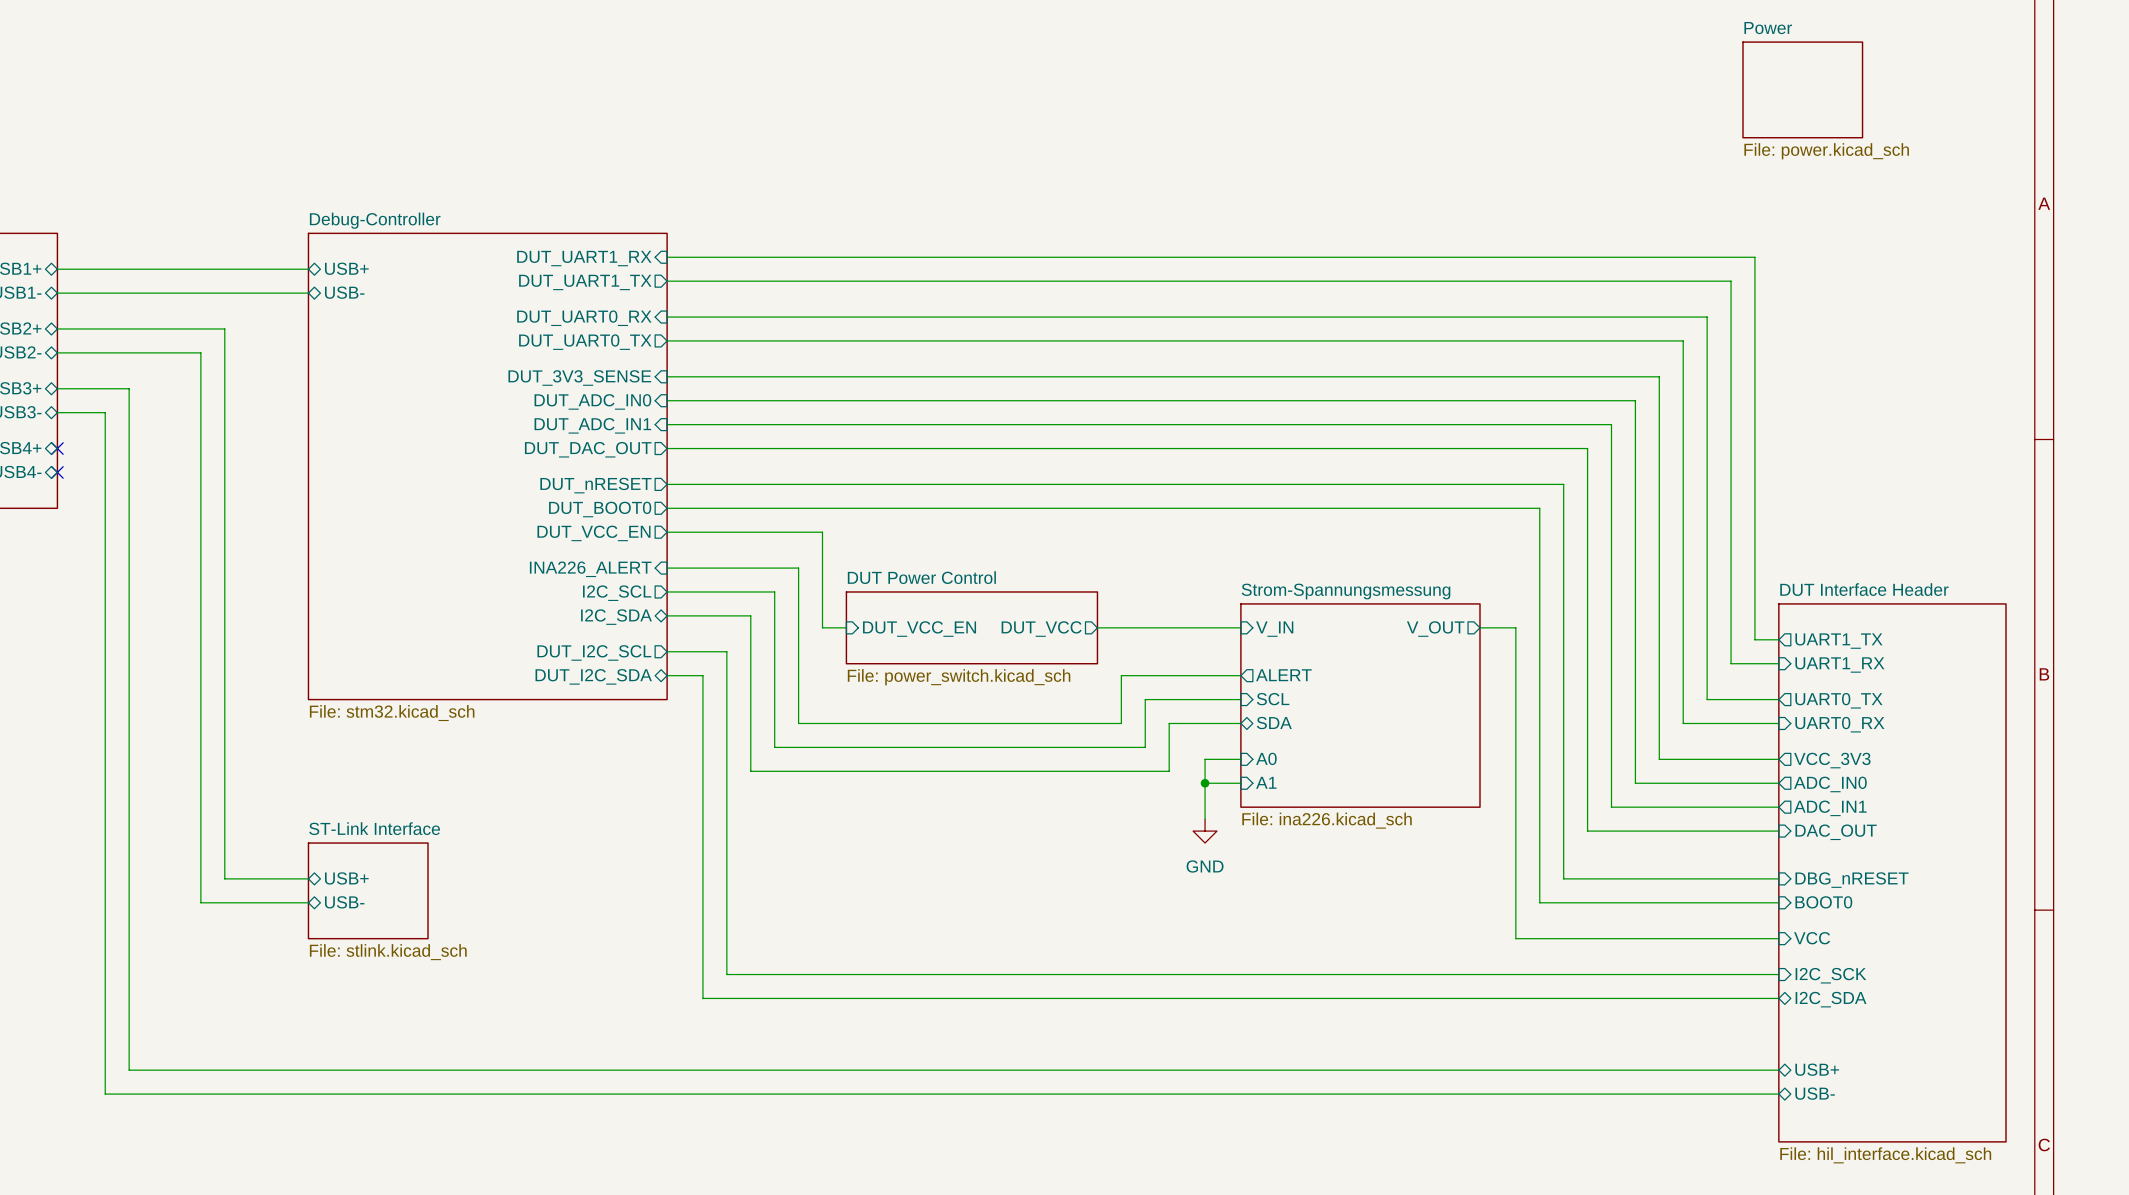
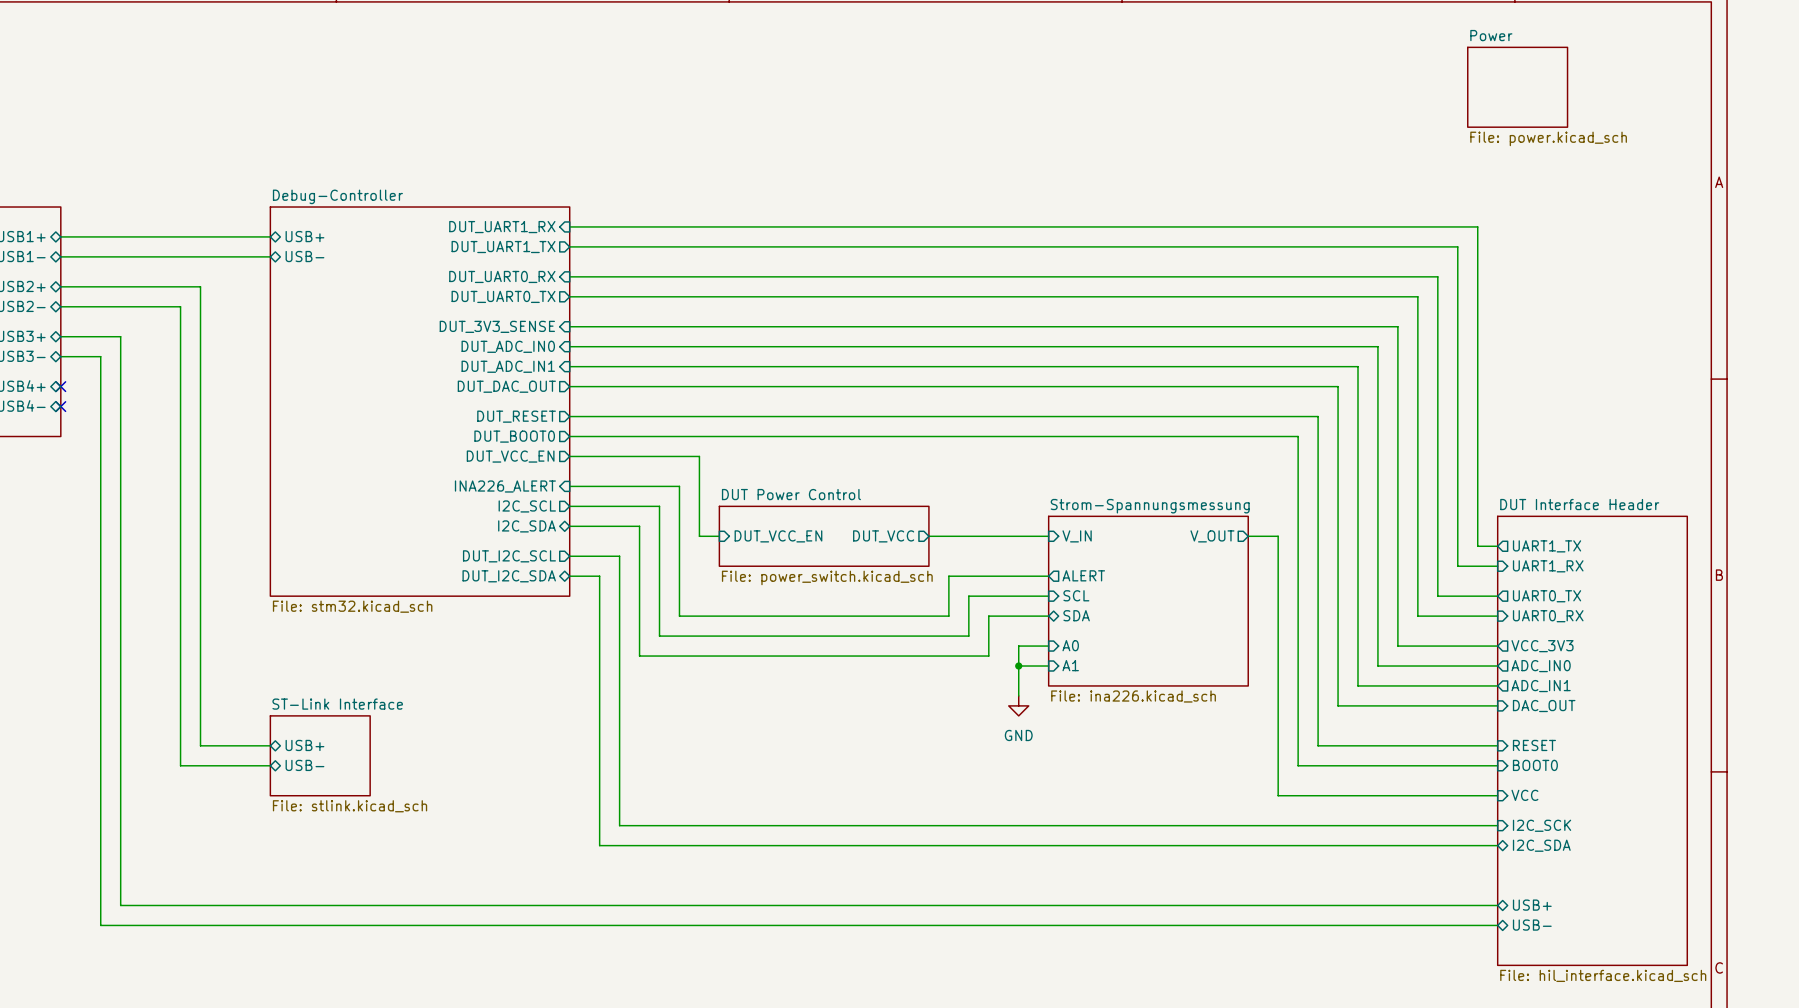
sheet pin: DUT_nRESET (595, 485) -> DUT_RESET (516, 416)
sheet pin: DBG_nRESET (1852, 880) -> RESET (1534, 745)

